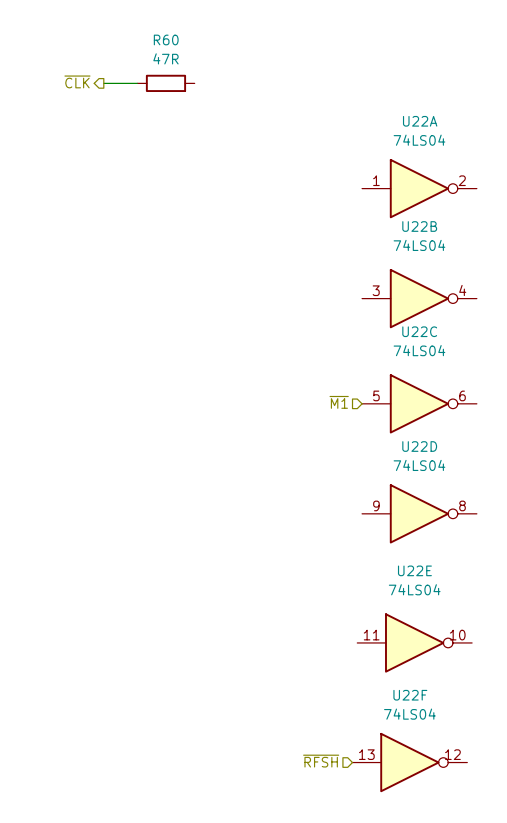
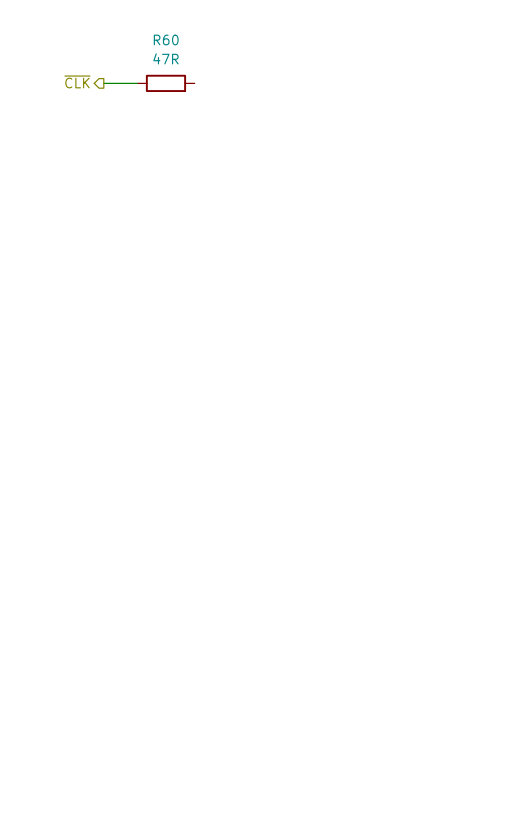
U22A: 74LS04 (419, 188) -> none
U22B: 74LS04 (419, 298) -> none
hierarchical label: ~{M1} (339, 402) -> none
U22C: 74LS04 (419, 403) -> none
U22D: 74LS04 (419, 513) -> none
U22E: 74LS04 (414, 642) -> none
hierarchical label: ~{RFSH} (321, 761) -> none
U22F: 74LS04 (409, 762) -> none

